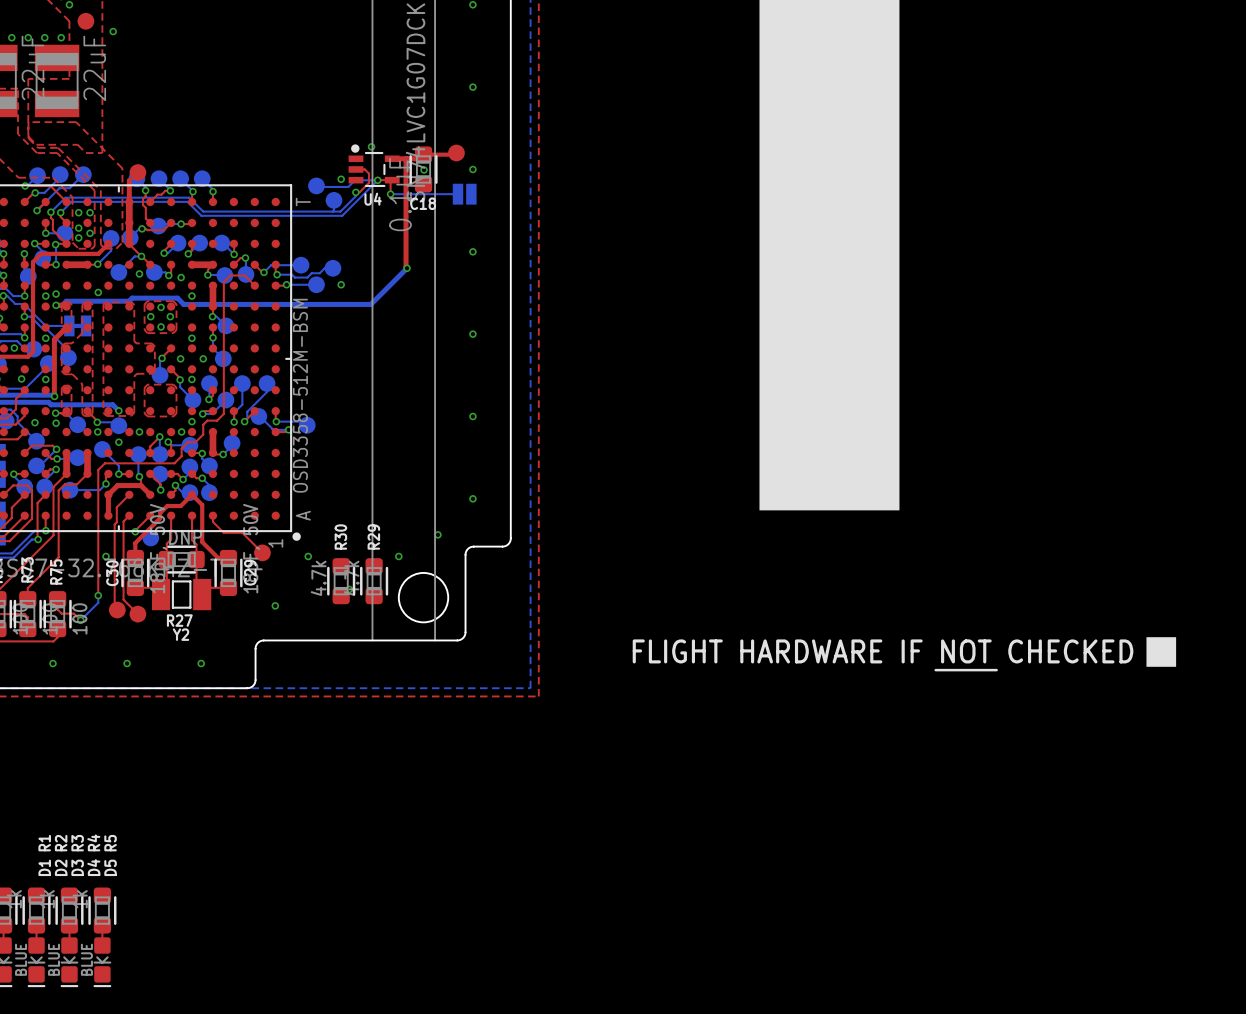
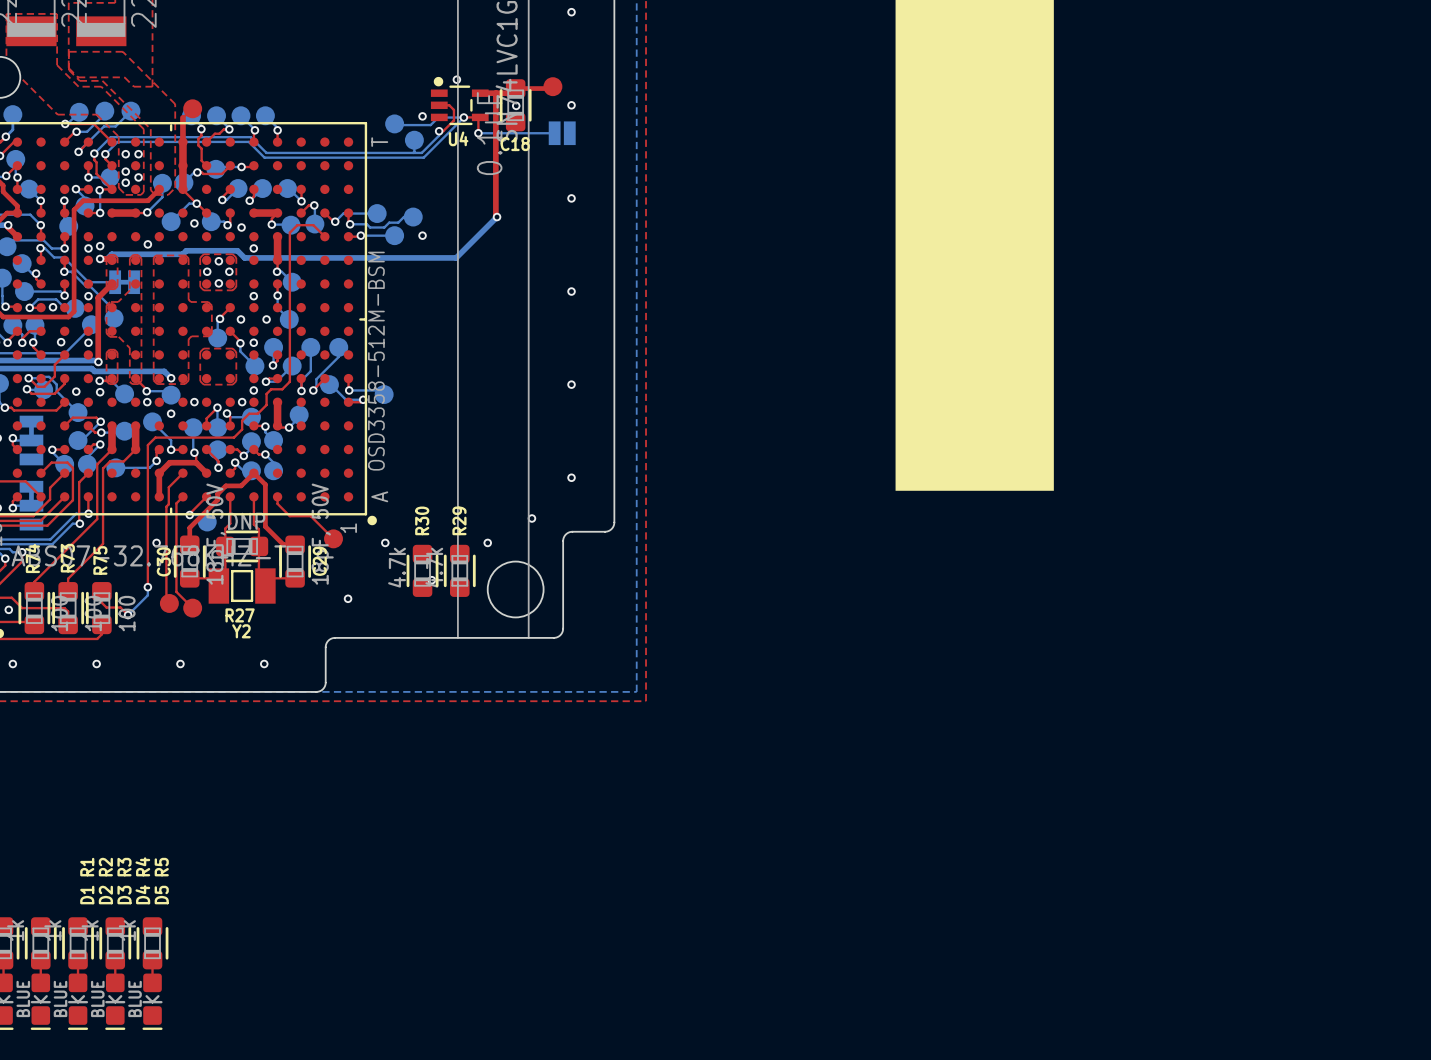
drawing: [934, 637, 1177, 672] -> none

